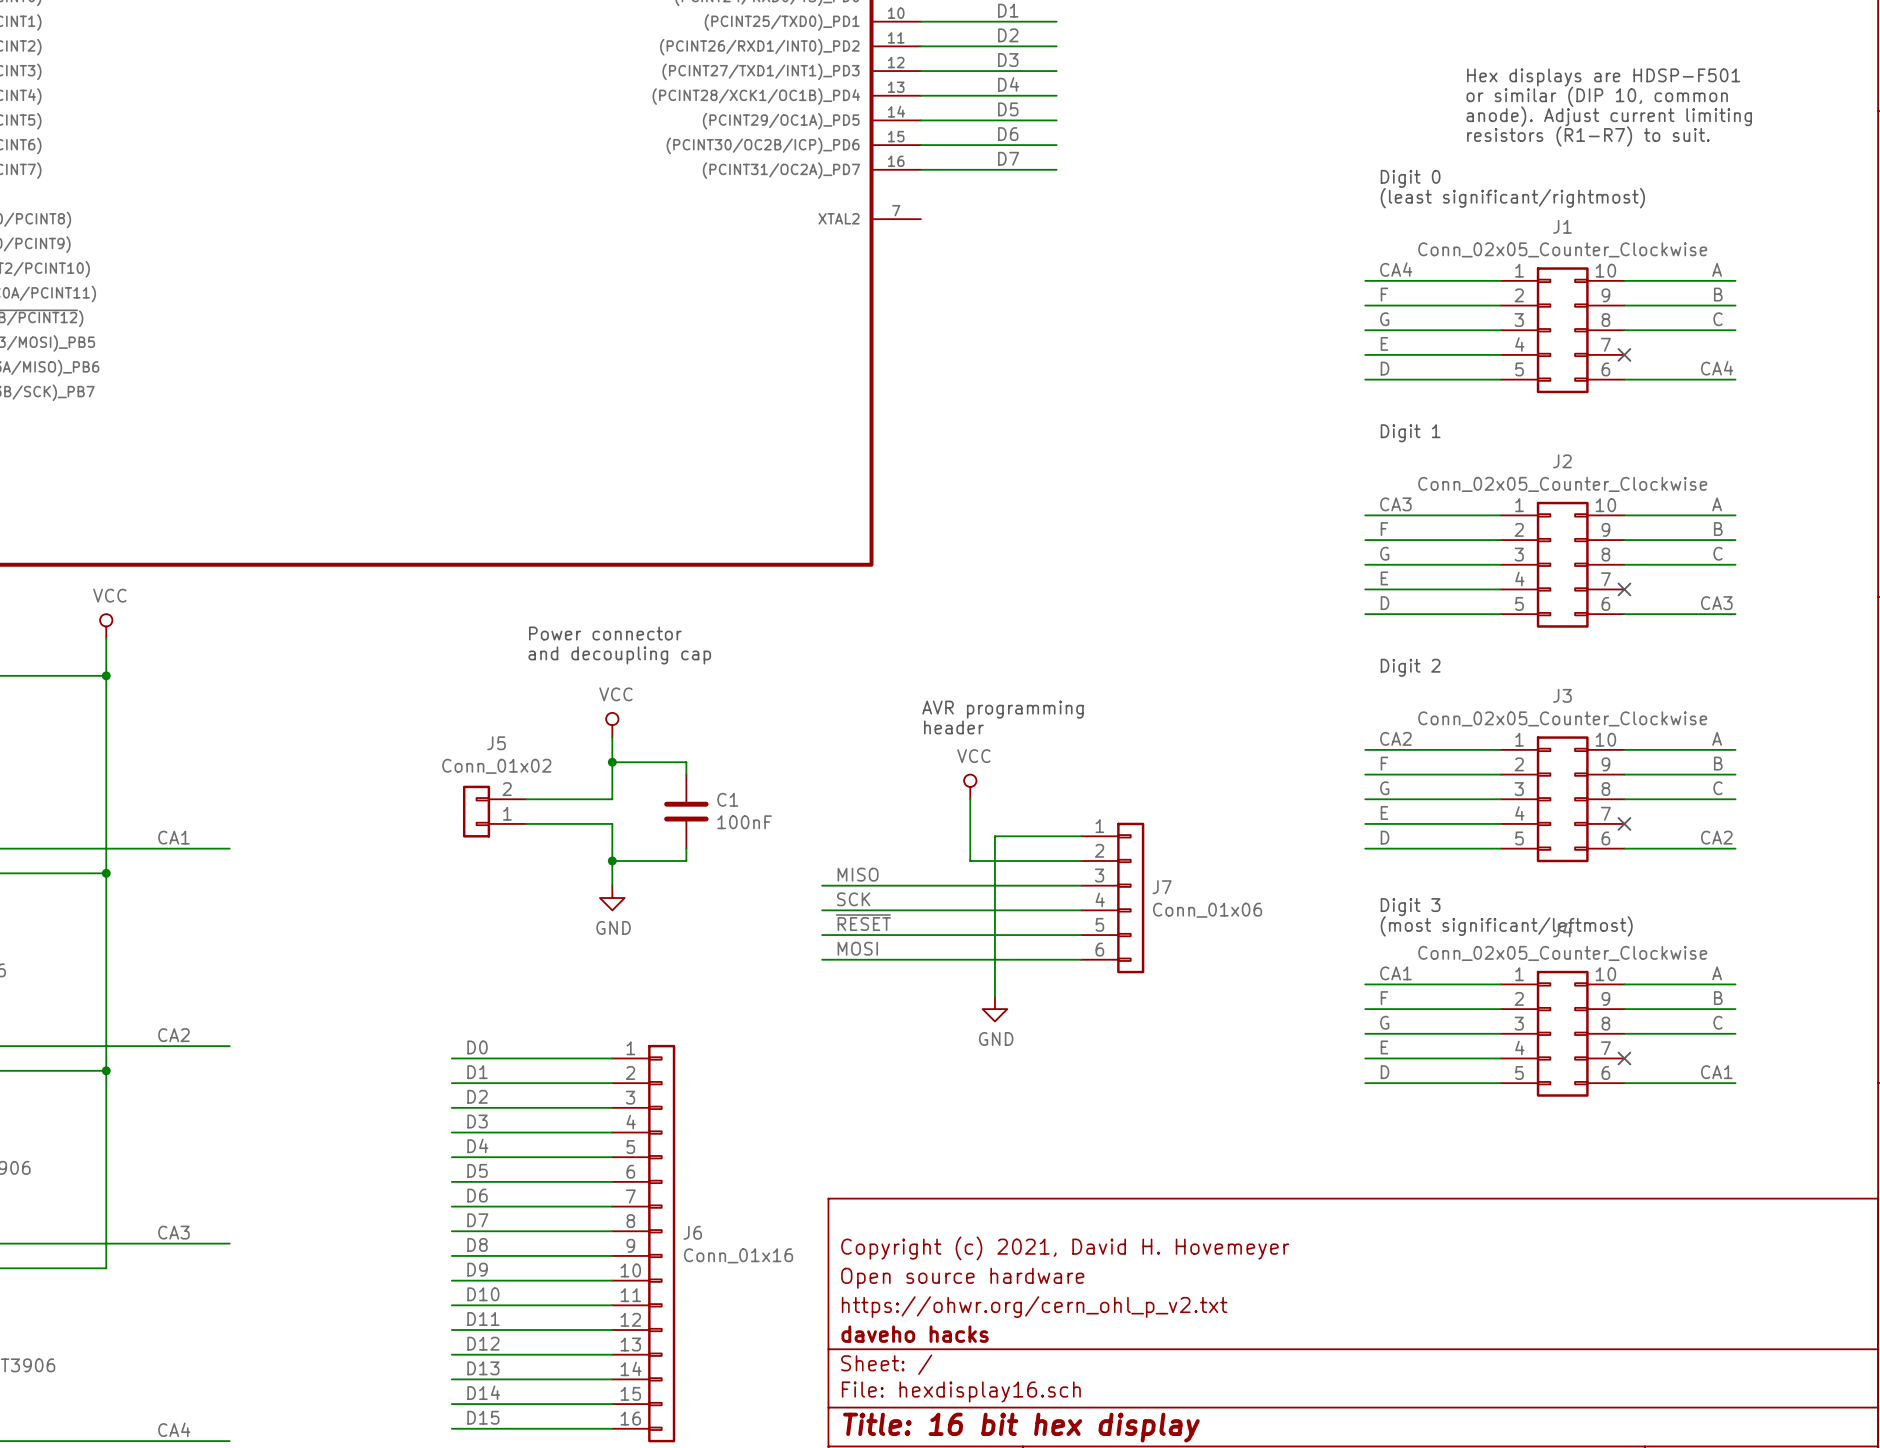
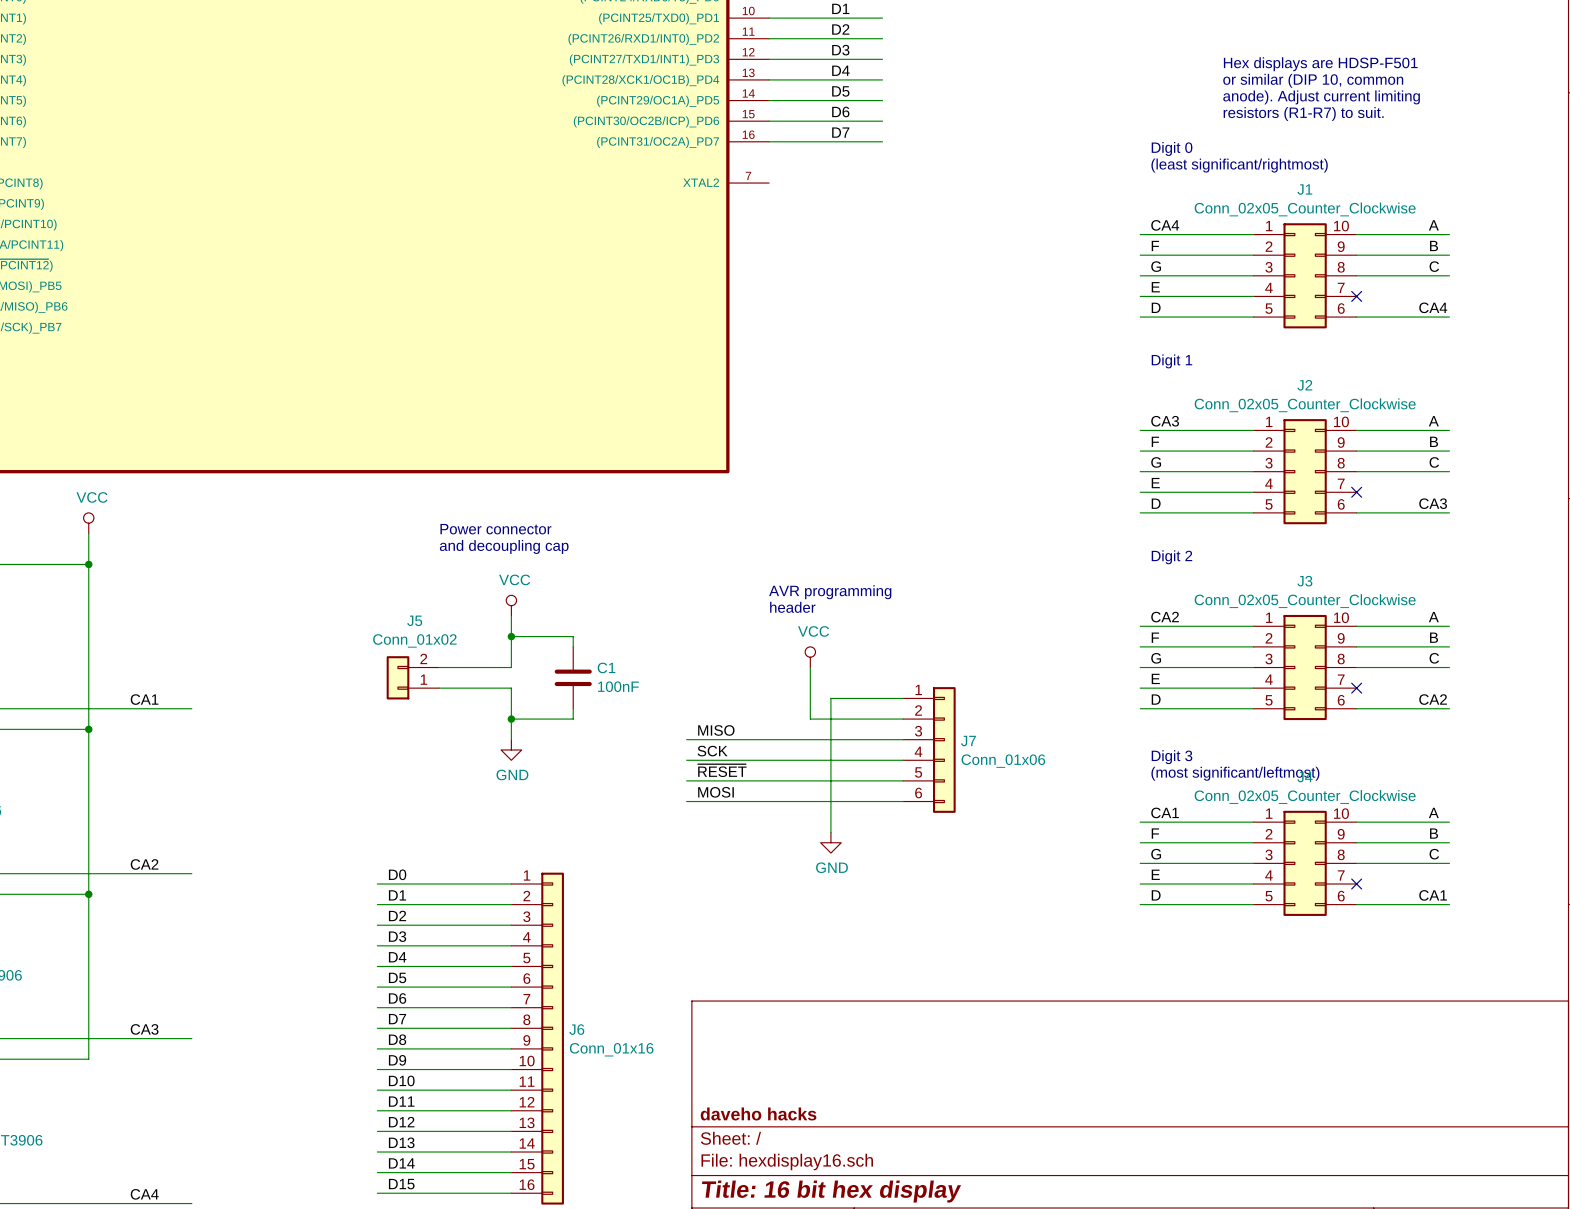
title block: Copyright (c) 2021, David H. Hovemeyer (1065, 1248) -> none
title block: Open source hardware (962, 1278) -> none
title block: https://ohwr.org/cern_ohl_p_v2.txt (1034, 1307) -> none

